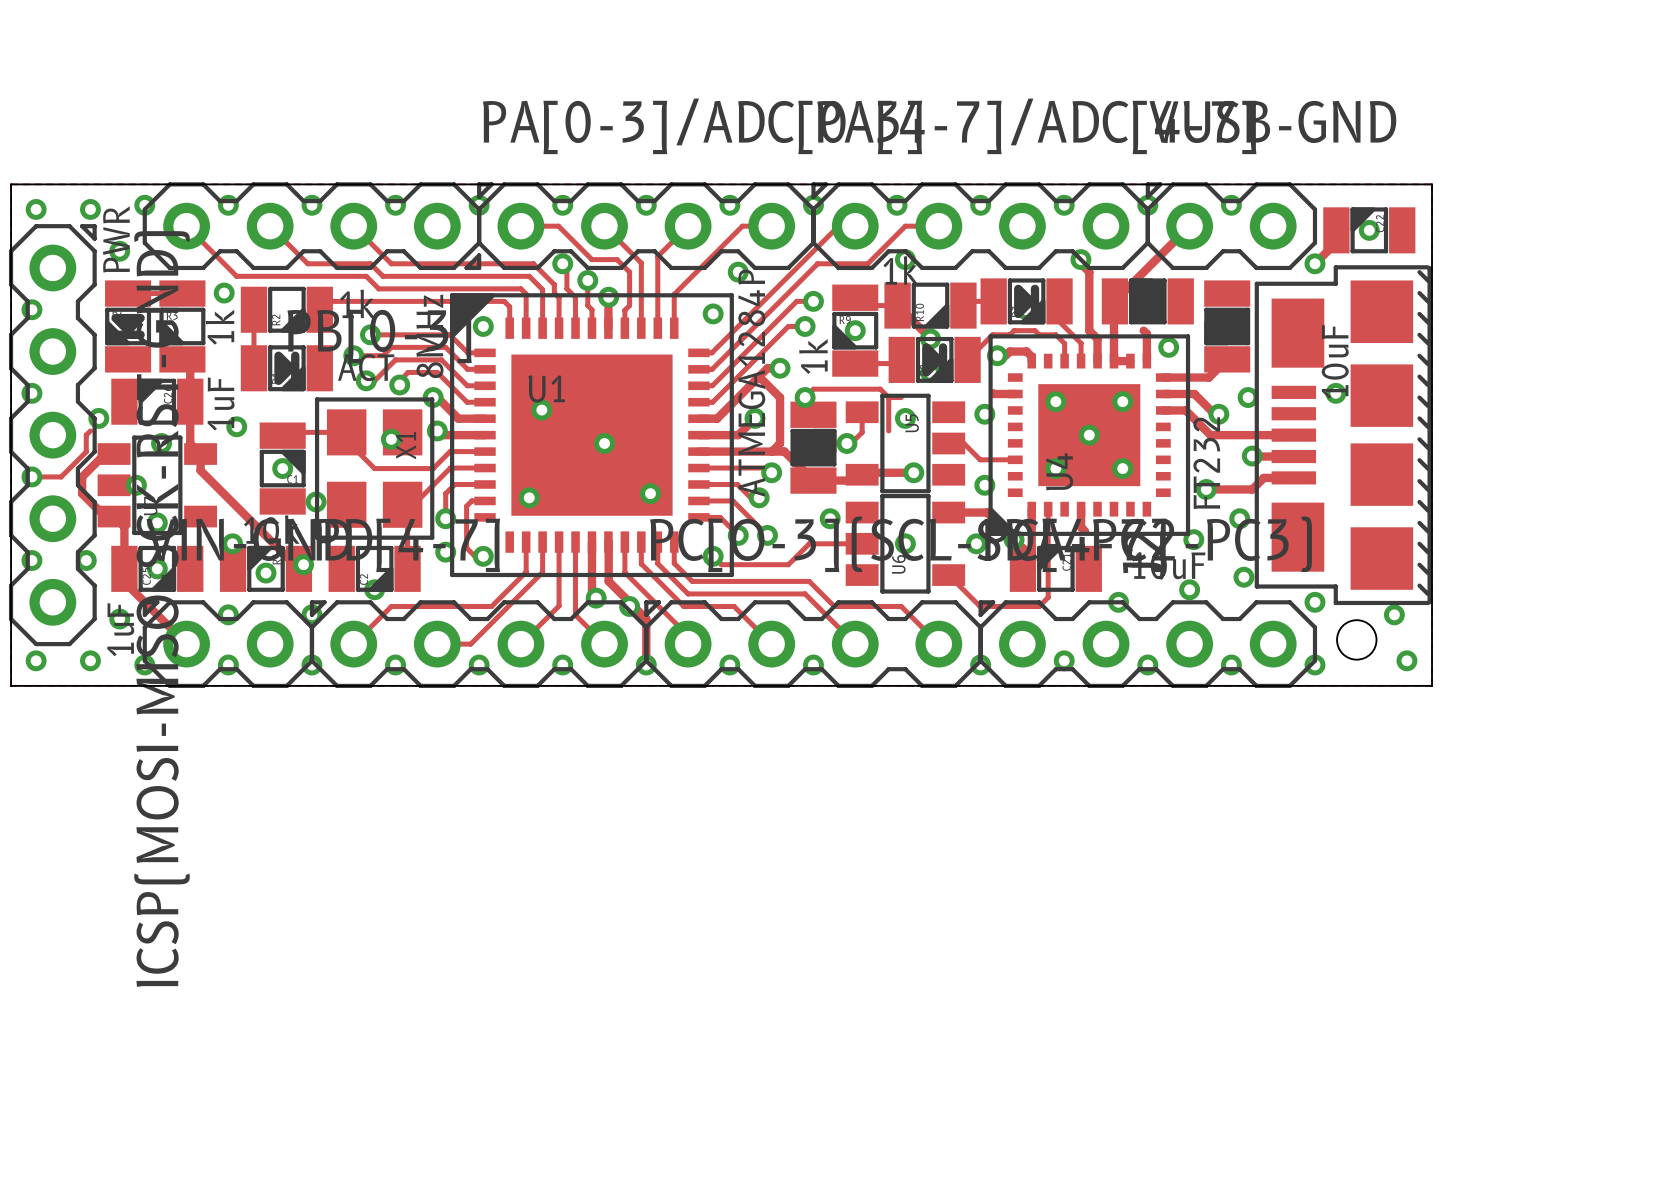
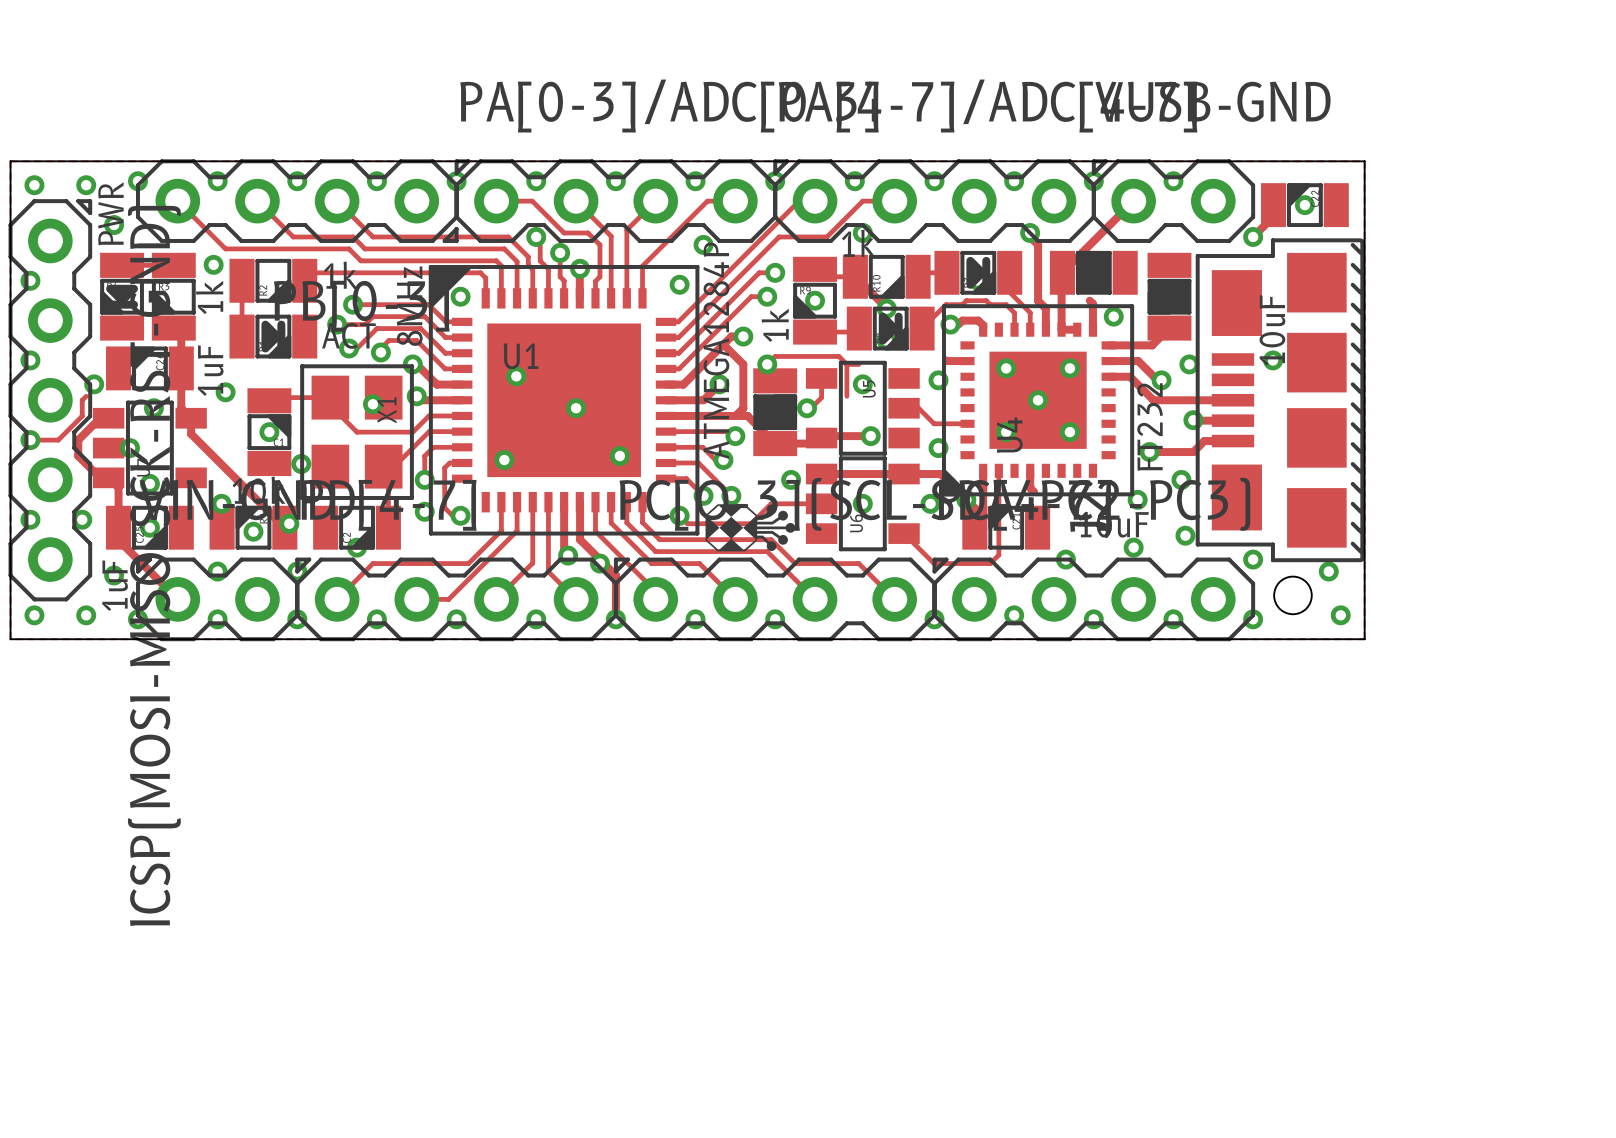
track: none -> (821, 474) (904, 474)
drawing: none -> [705, 504, 796, 552]

